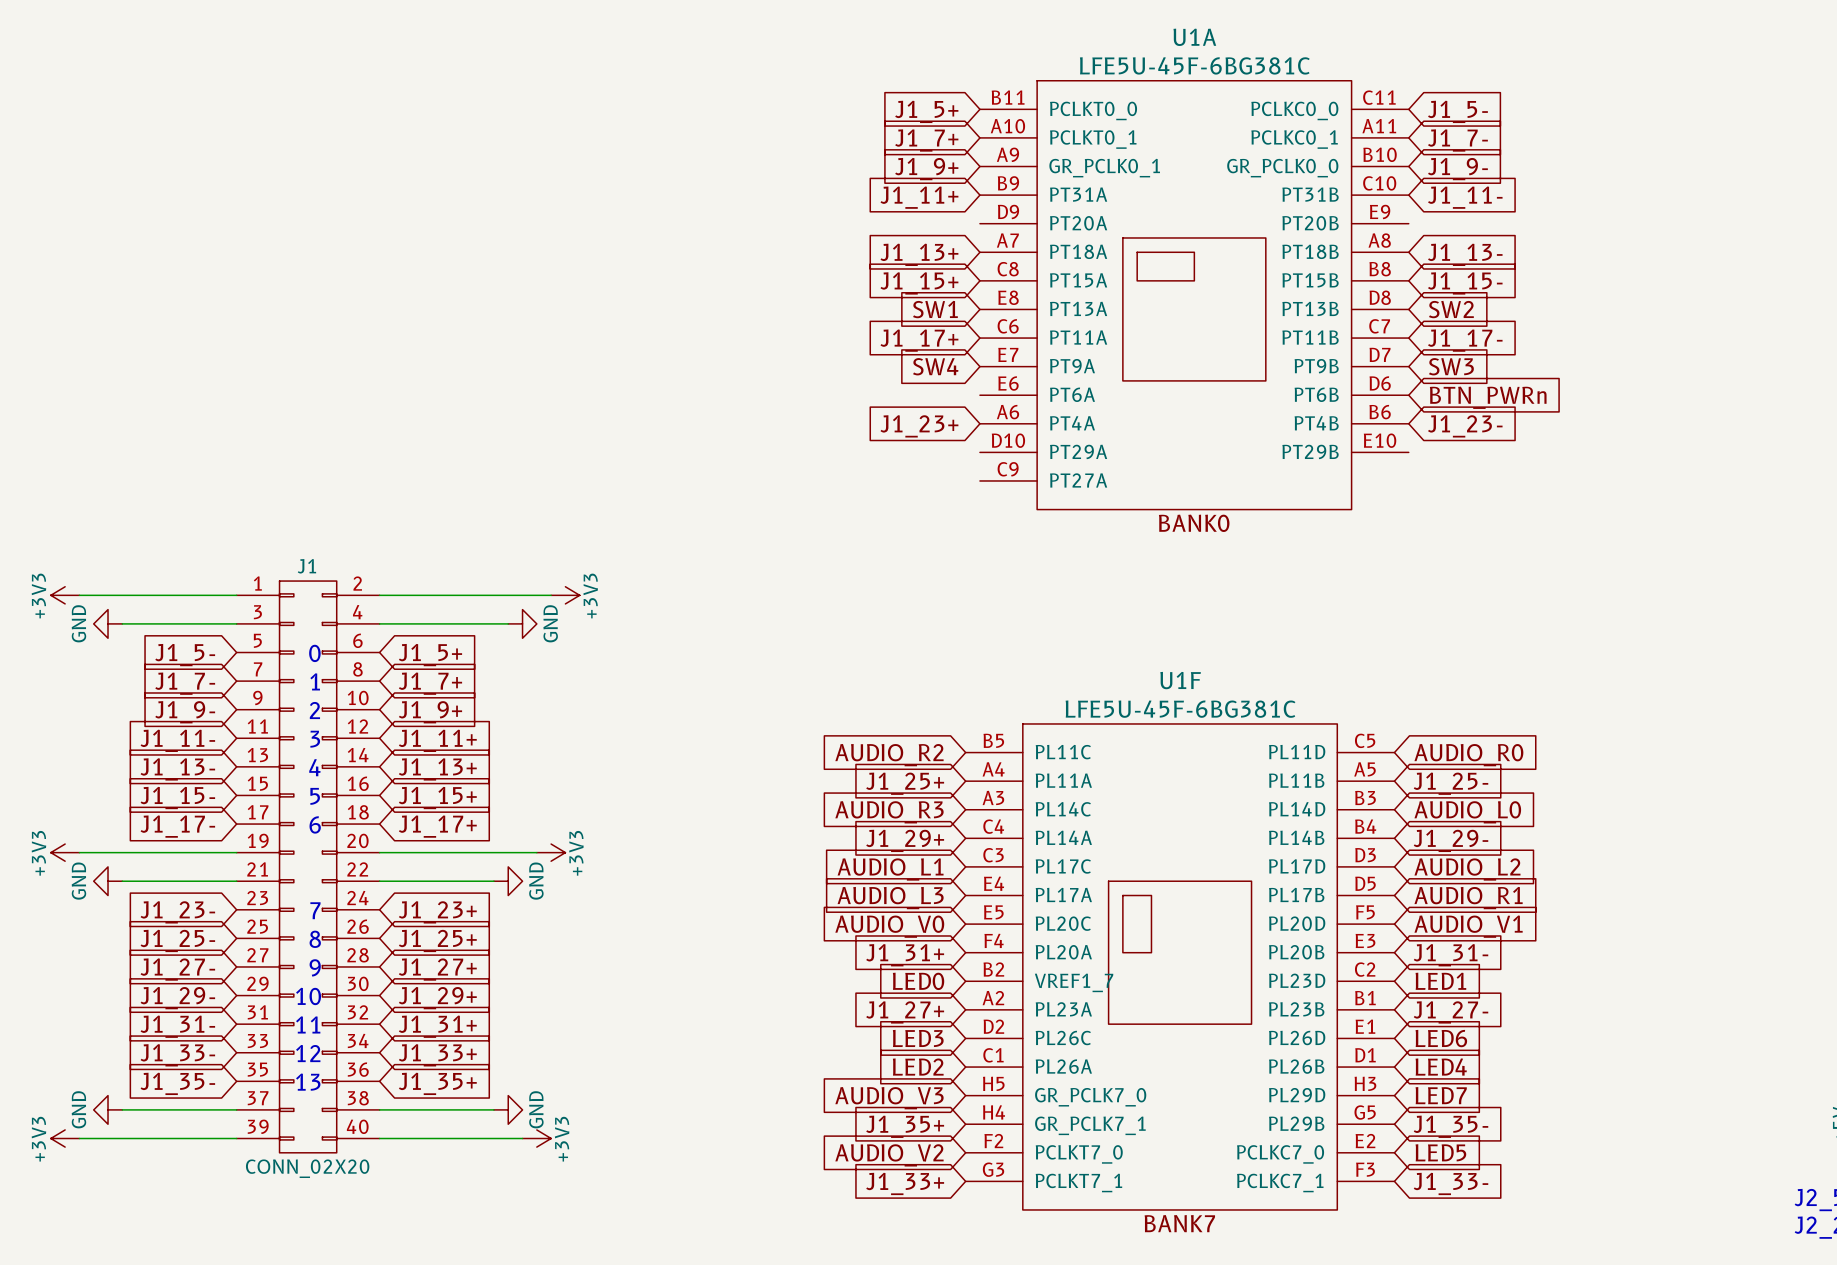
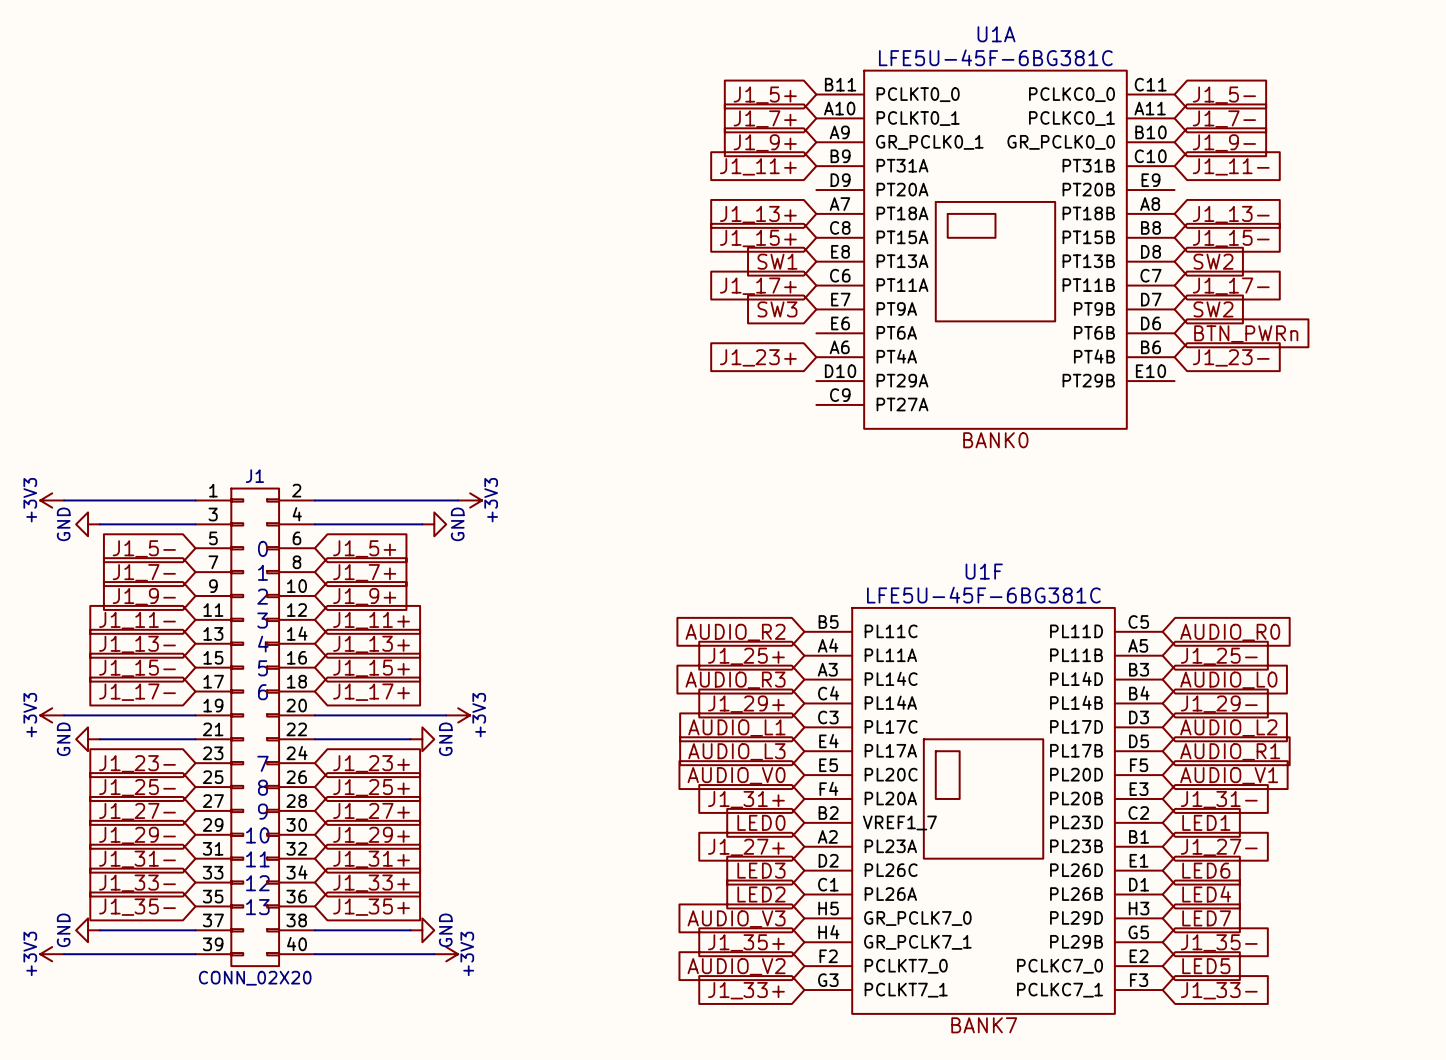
global label: SW4 (935, 366) -> SW3 (777, 309)
global label: SW3 (1451, 366) -> SW2 (1213, 309)

